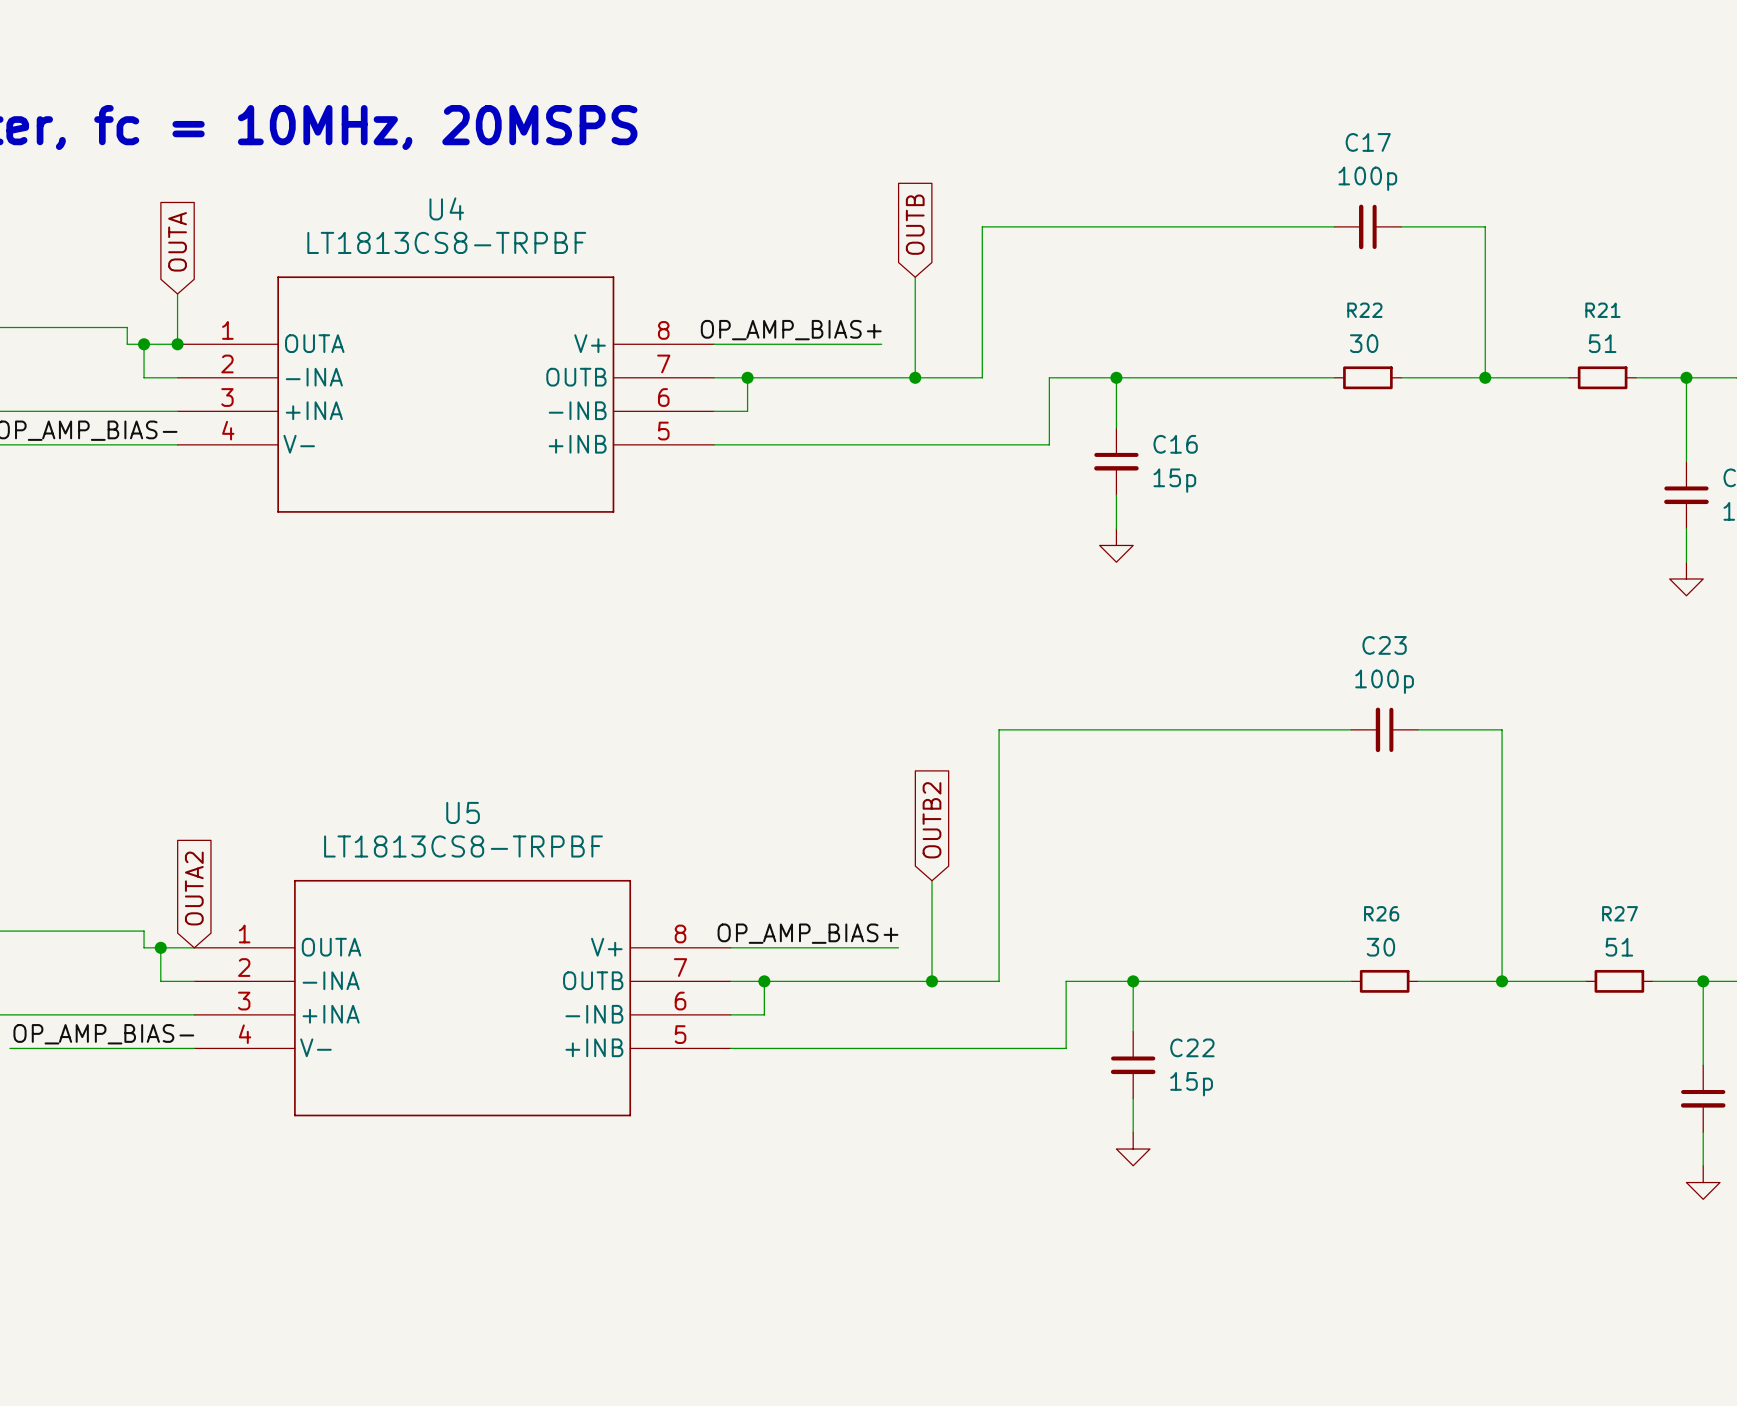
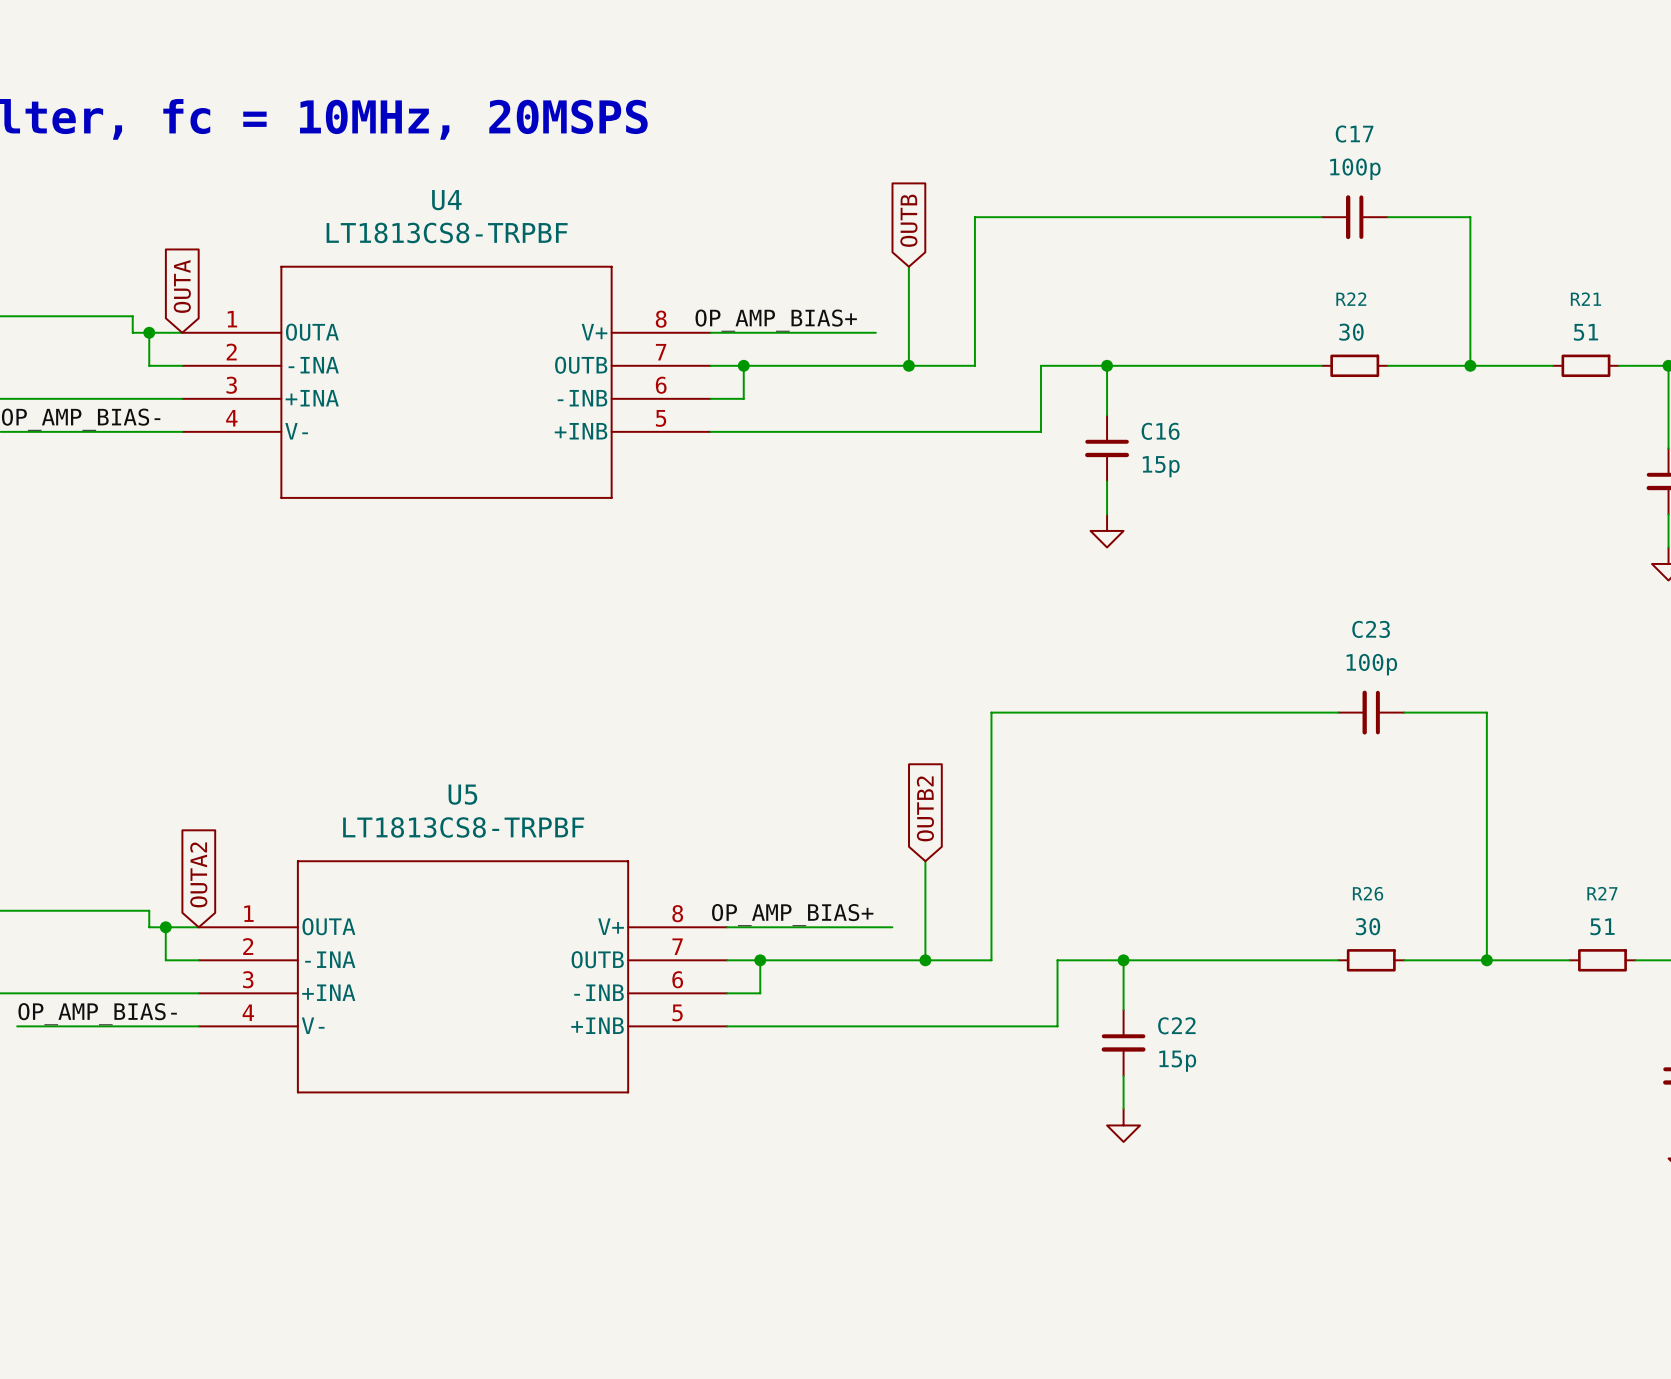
global label position: OUTA (177, 241) -> OUTA (182, 286)
wire: (177, 293) (177, 344) -> none
junction: (177, 344) -> none

